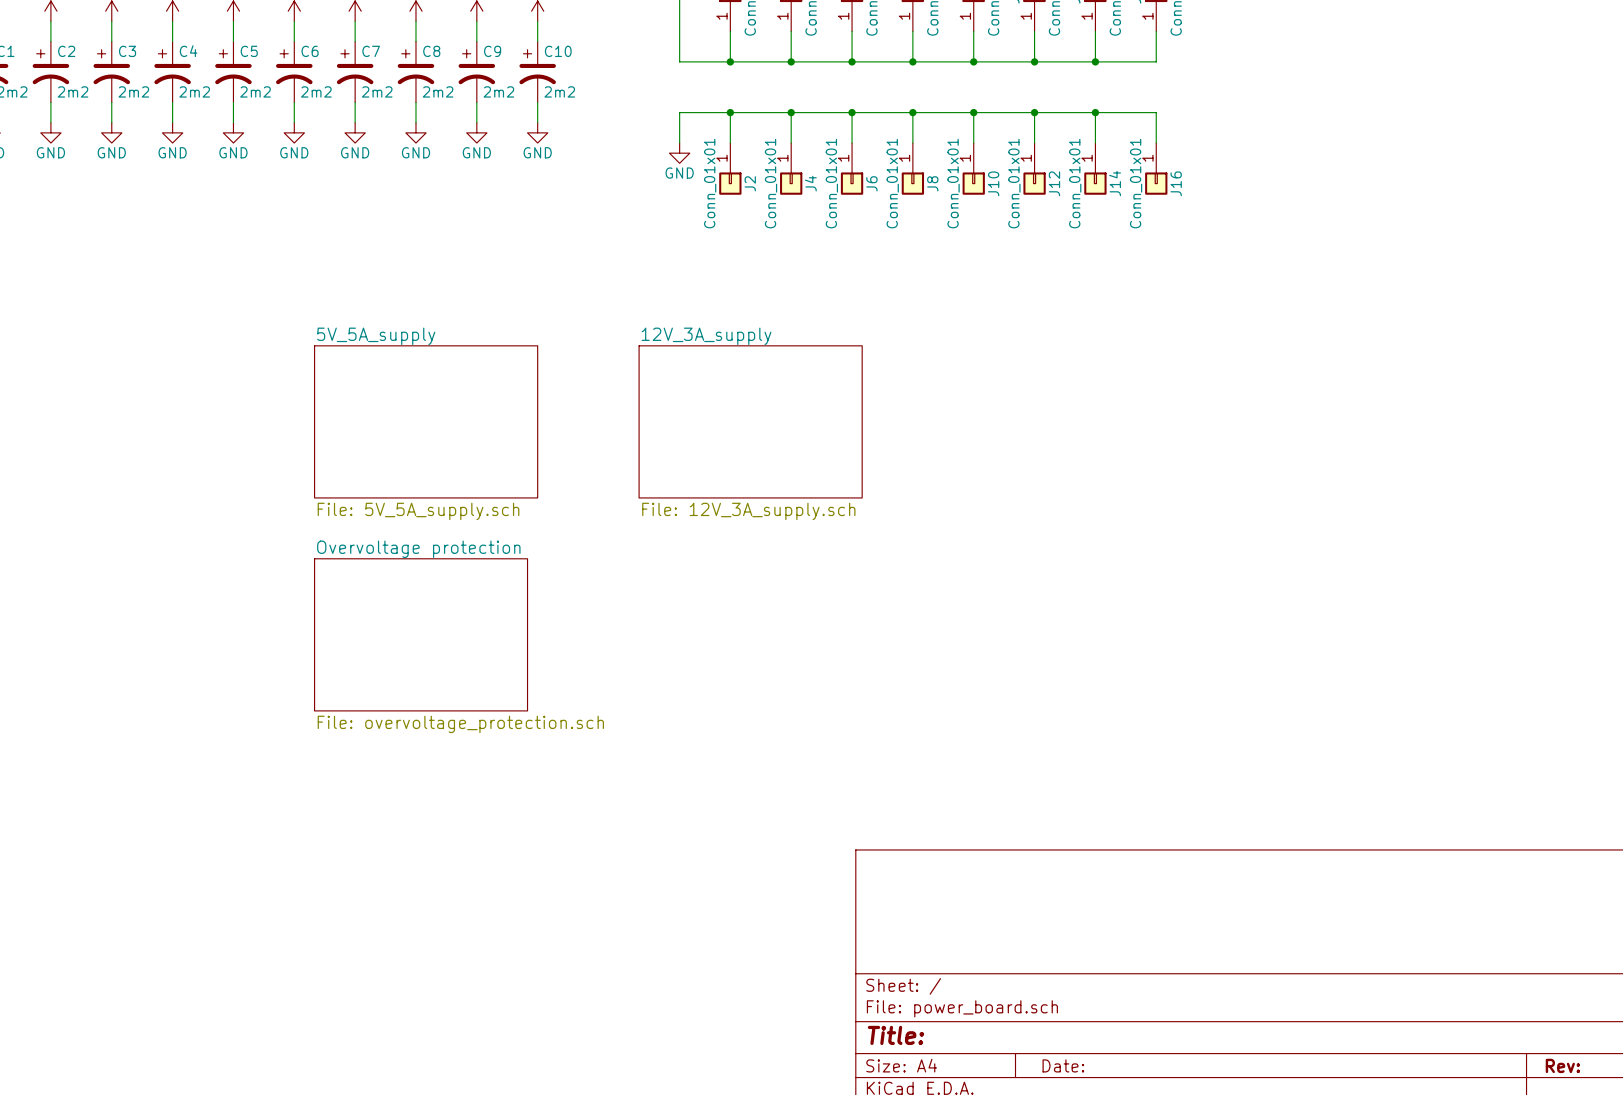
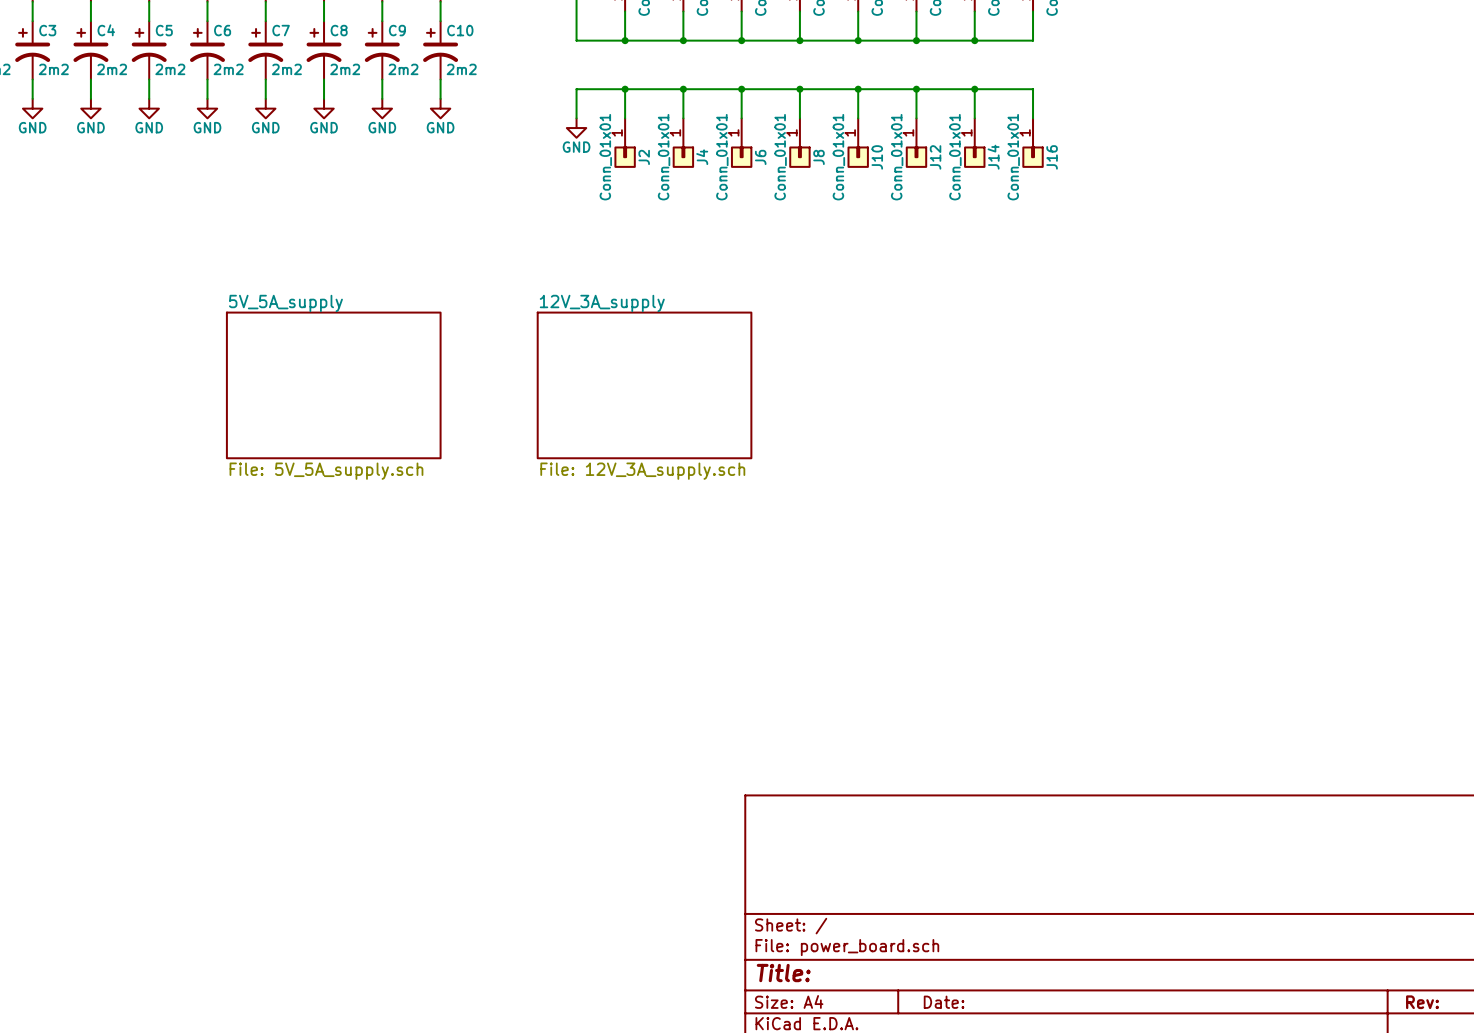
sheet Overvoltage protection: File: overvoltage_protection.sch (421, 634) -> none

